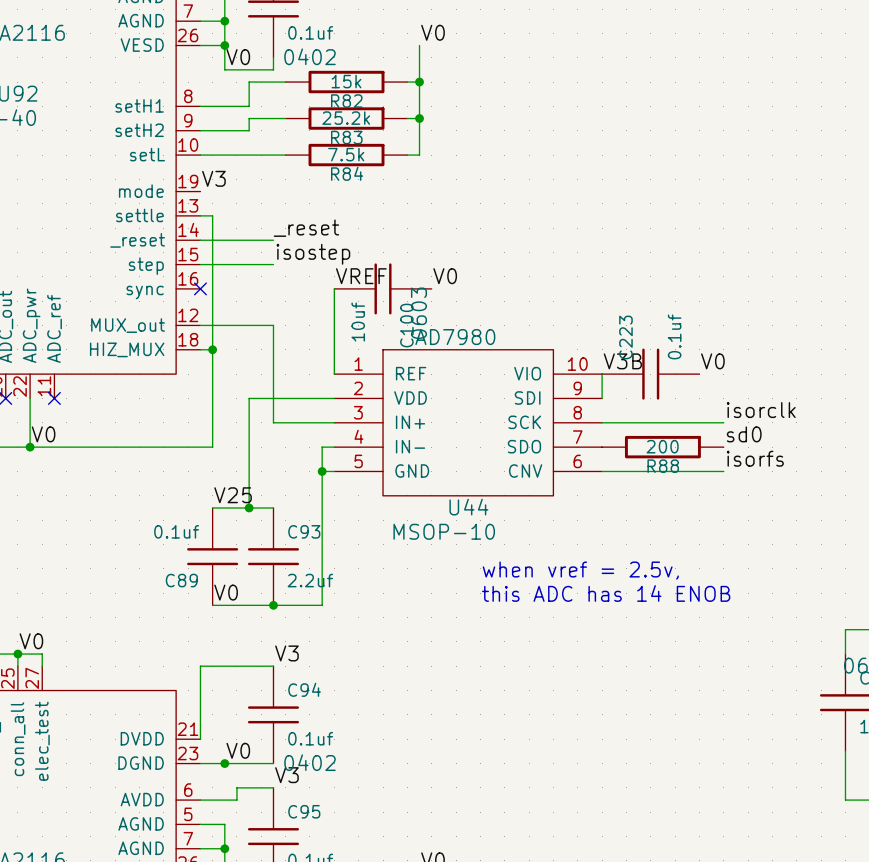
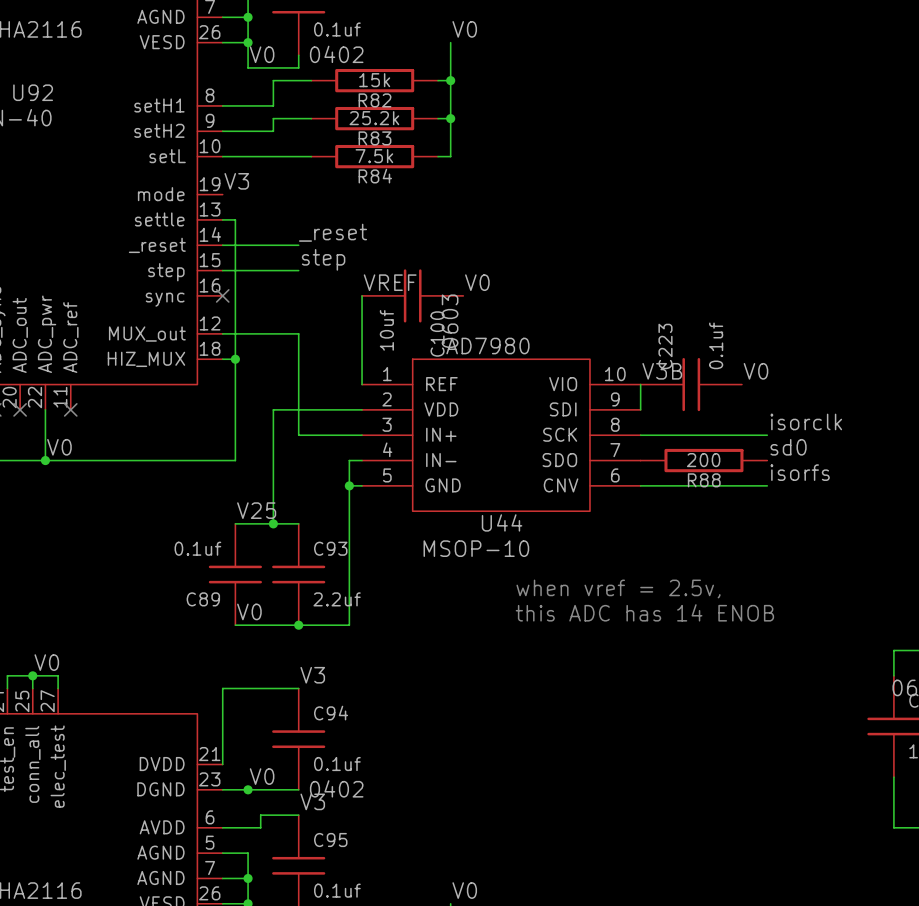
label: isostep (313, 254) -> step (323, 259)

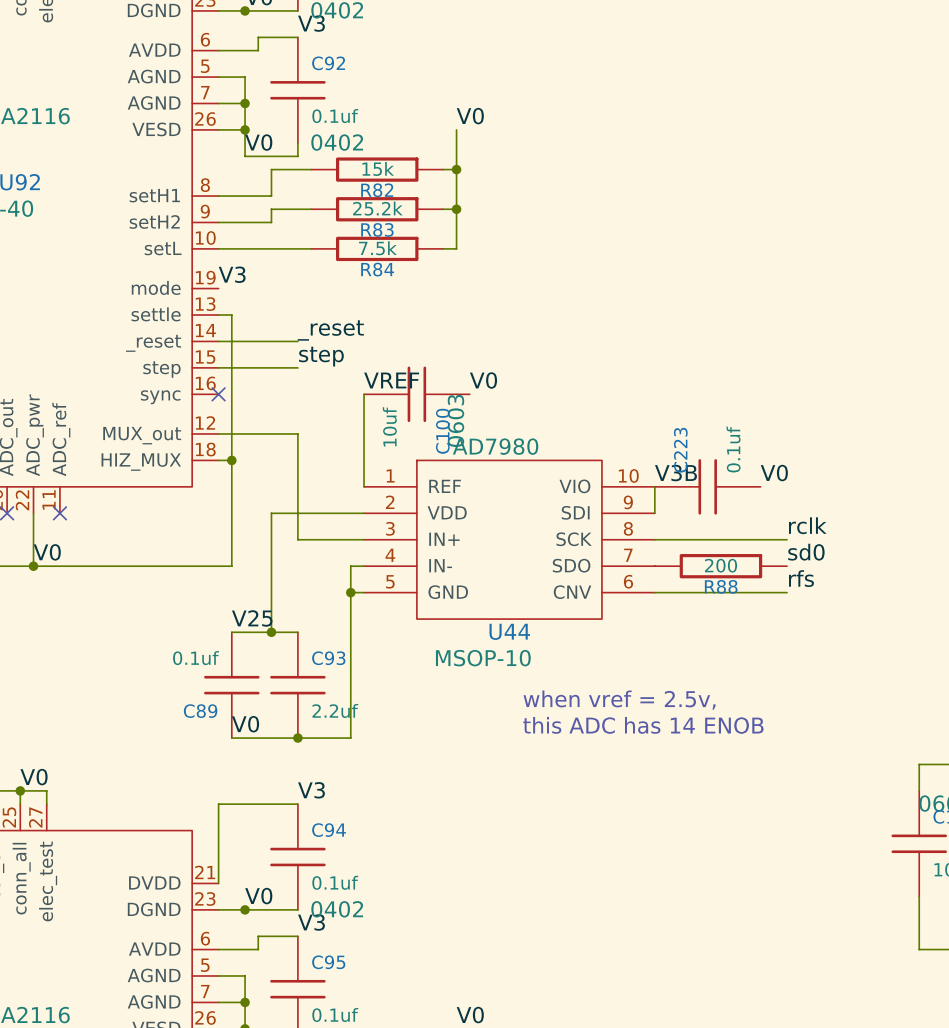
label: isorclk (806, 421) -> rclk (807, 525)
label: isorfs (800, 472) -> rfs (801, 578)

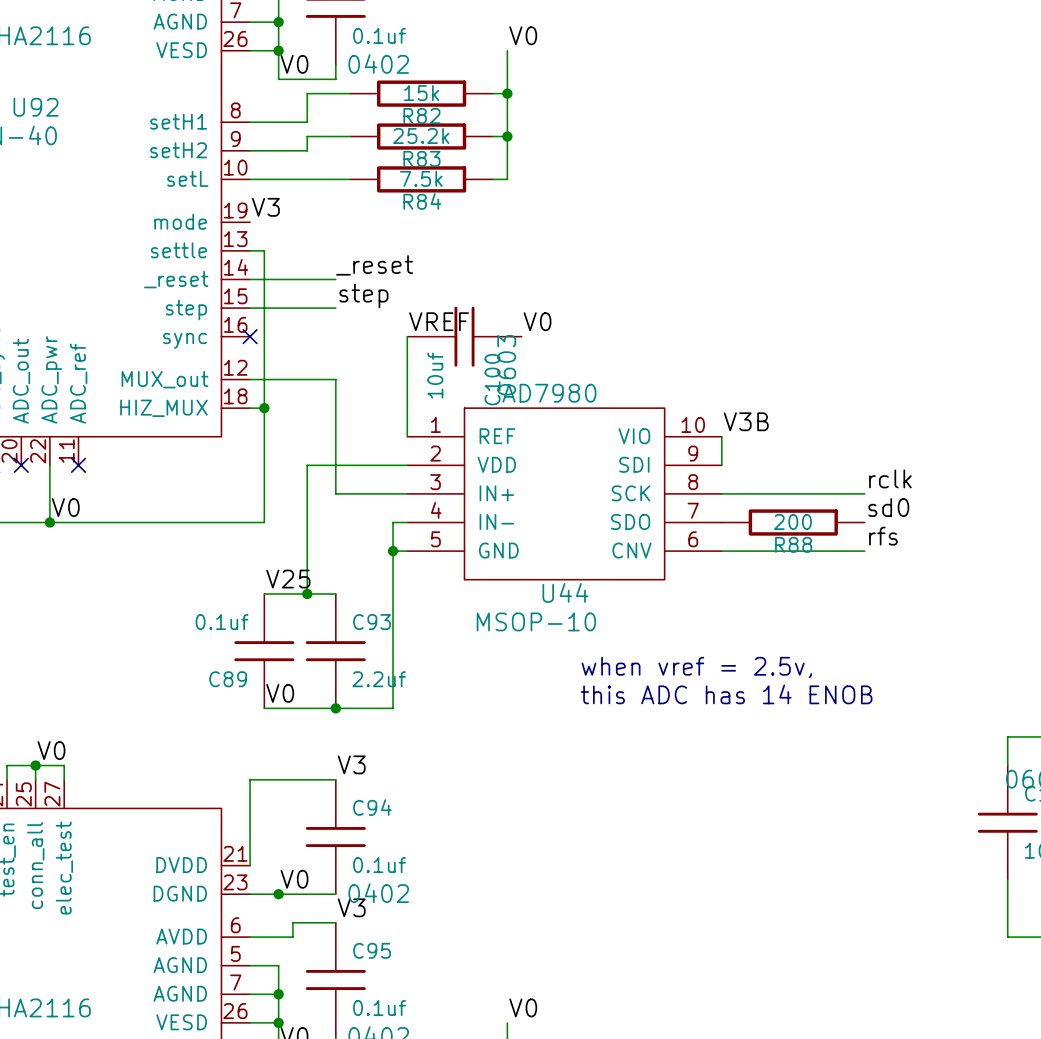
label: V0 (774, 473) -> none
C223: 0.1uf (707, 486) -> none

